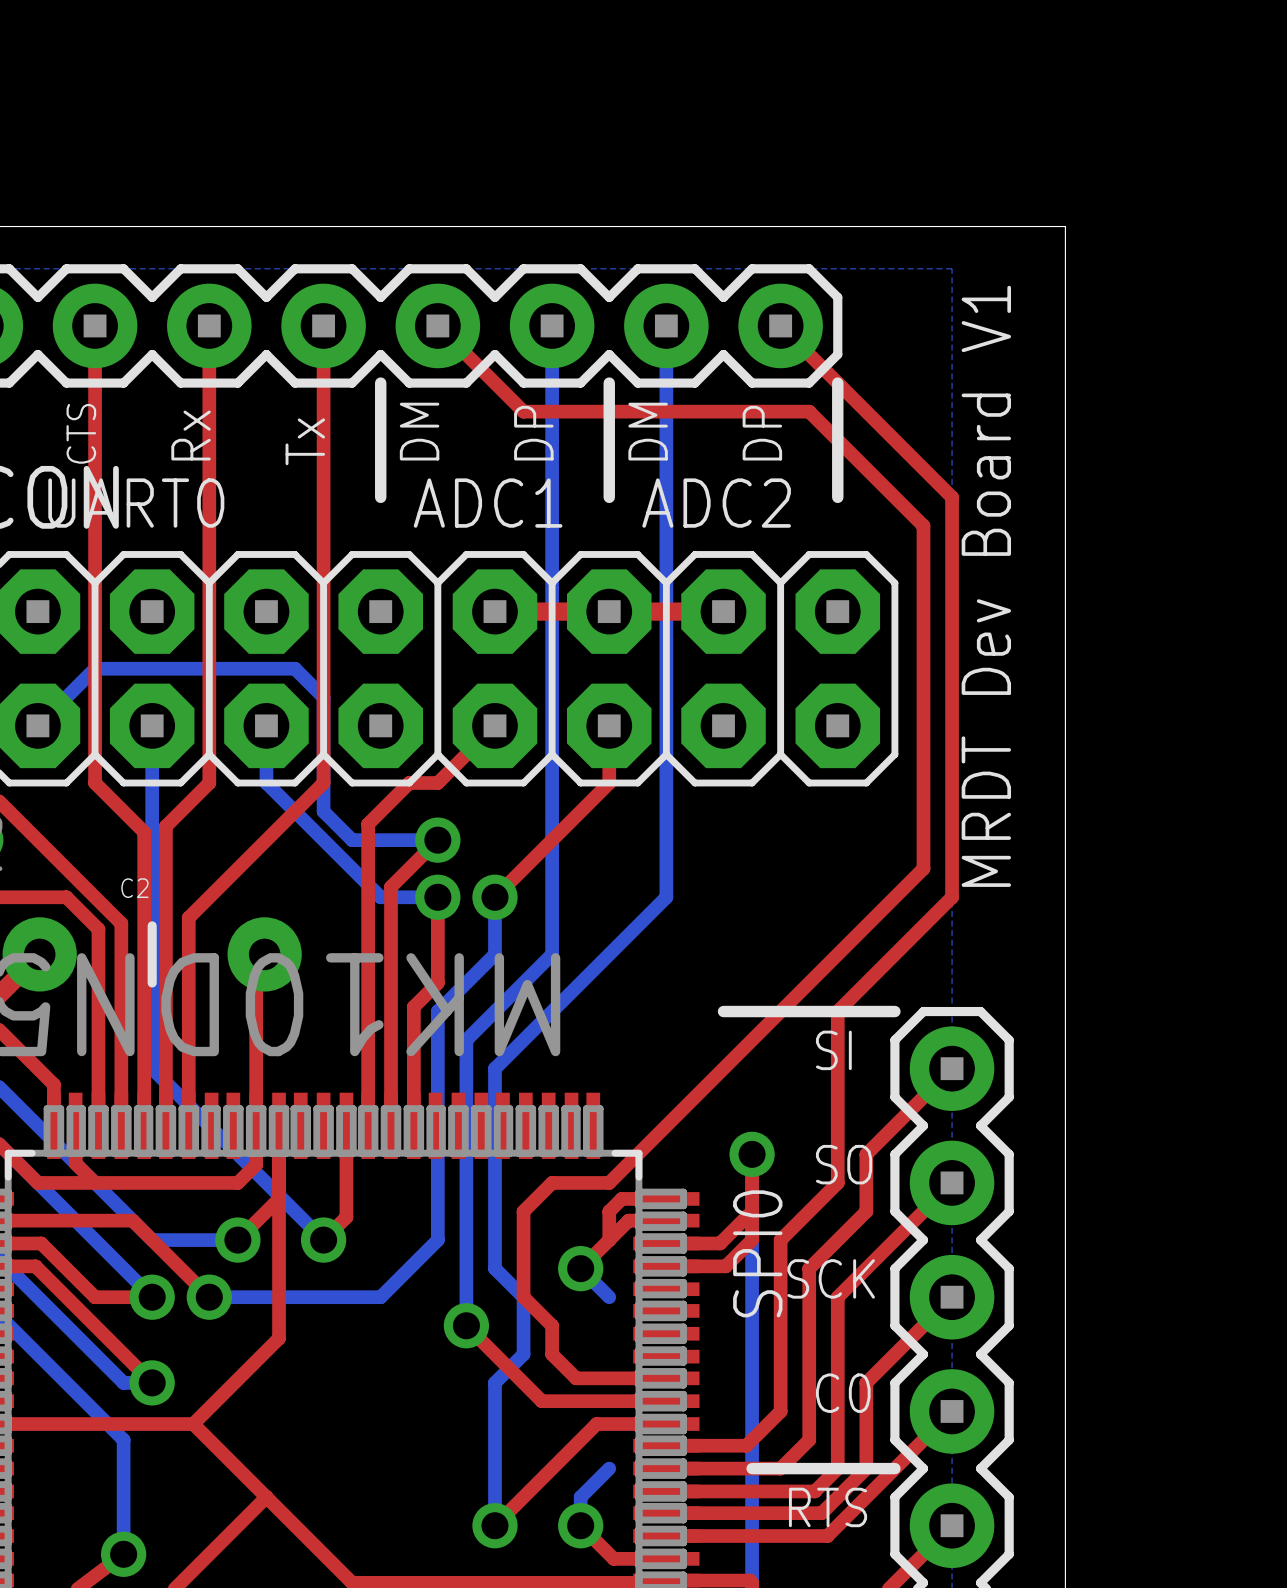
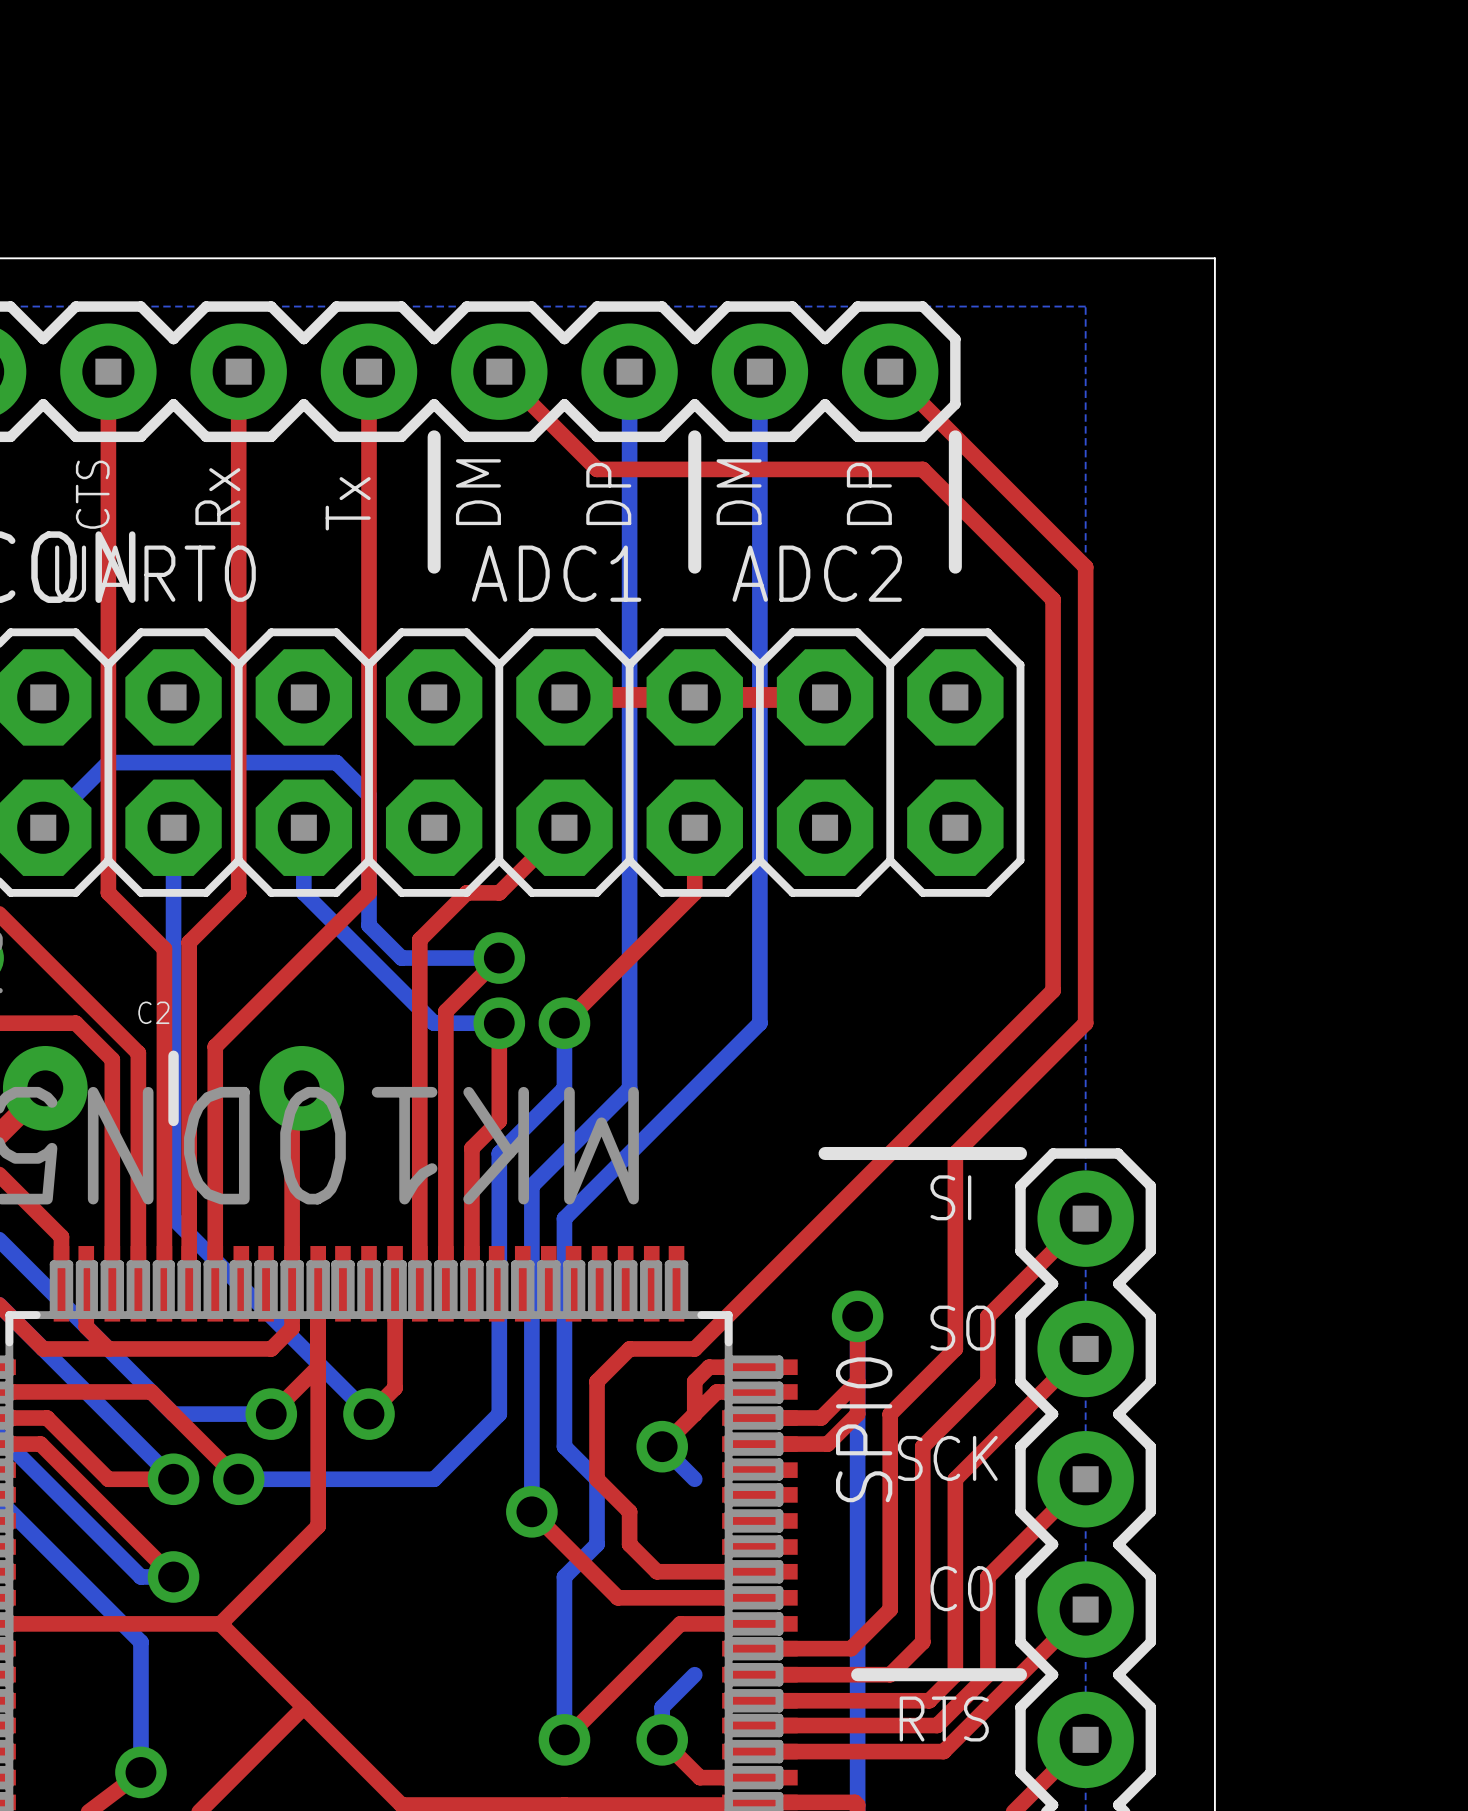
text: MRDT Dev Board V1 (986, 586) -> none

